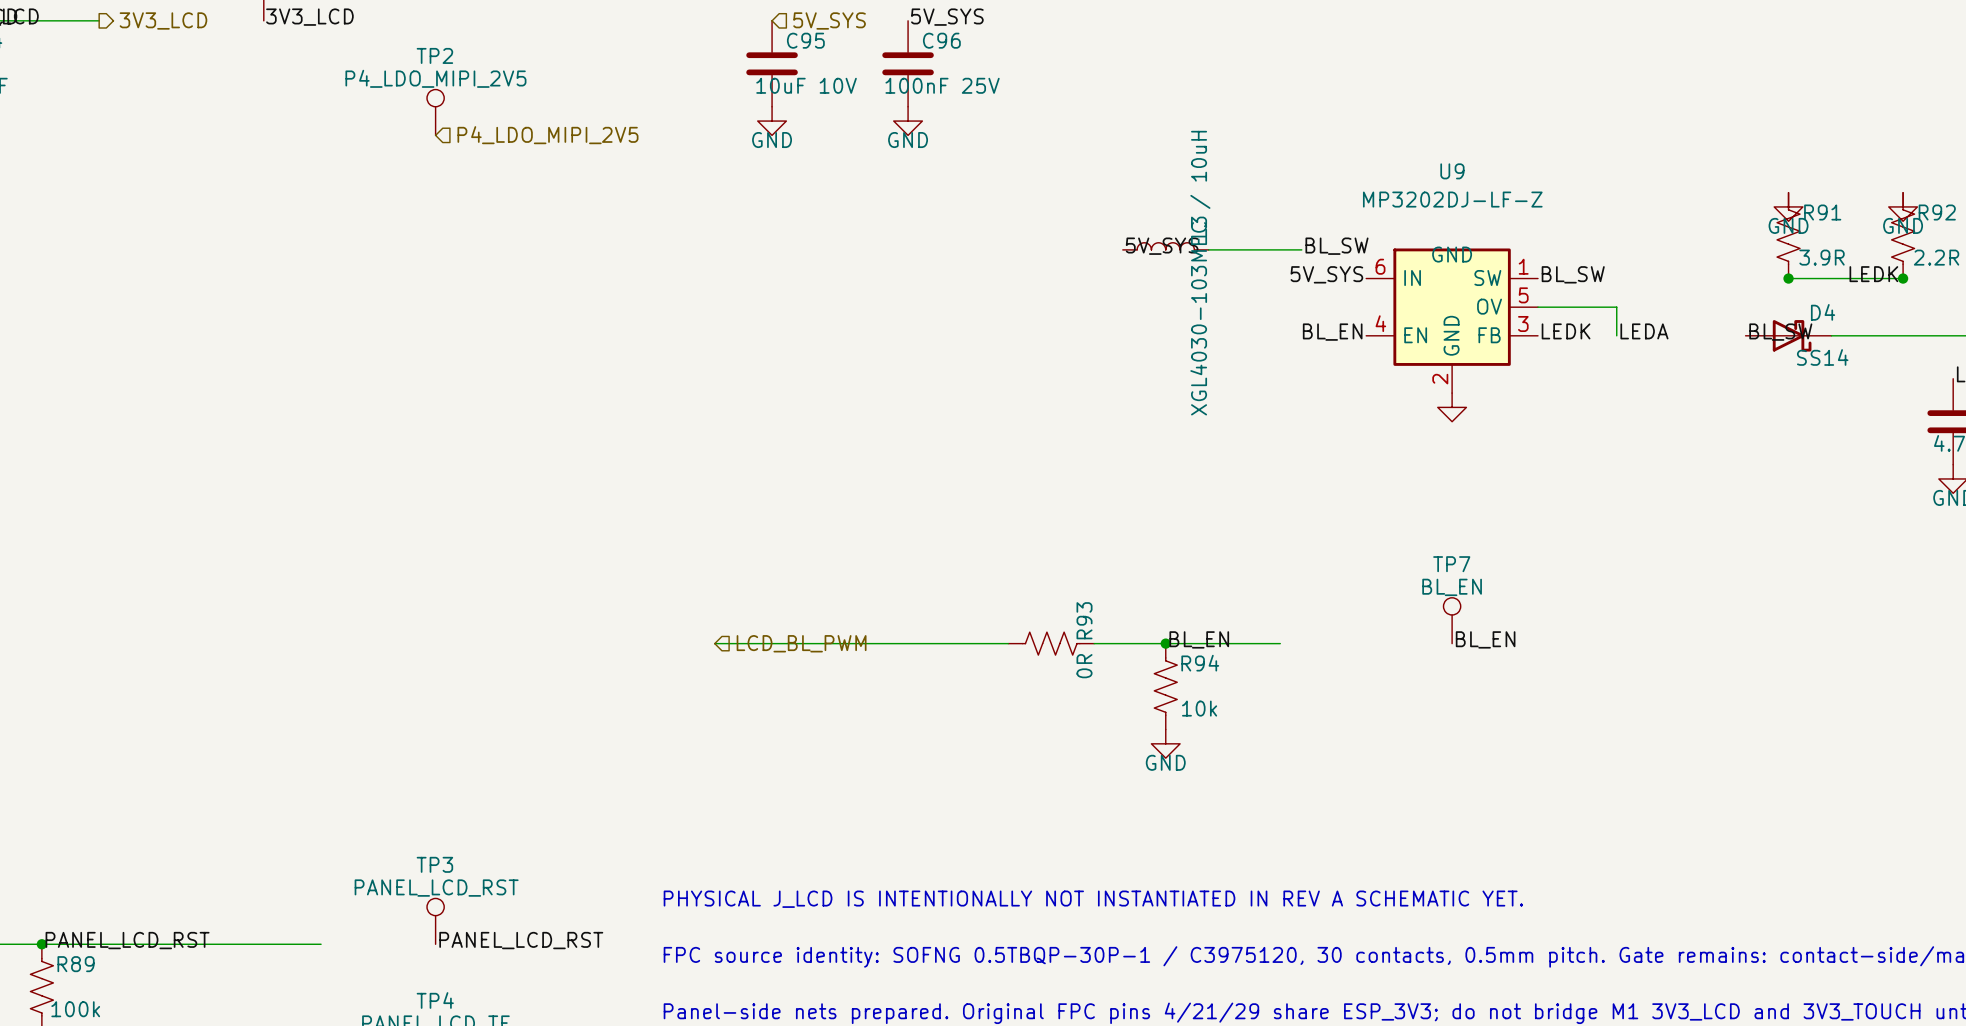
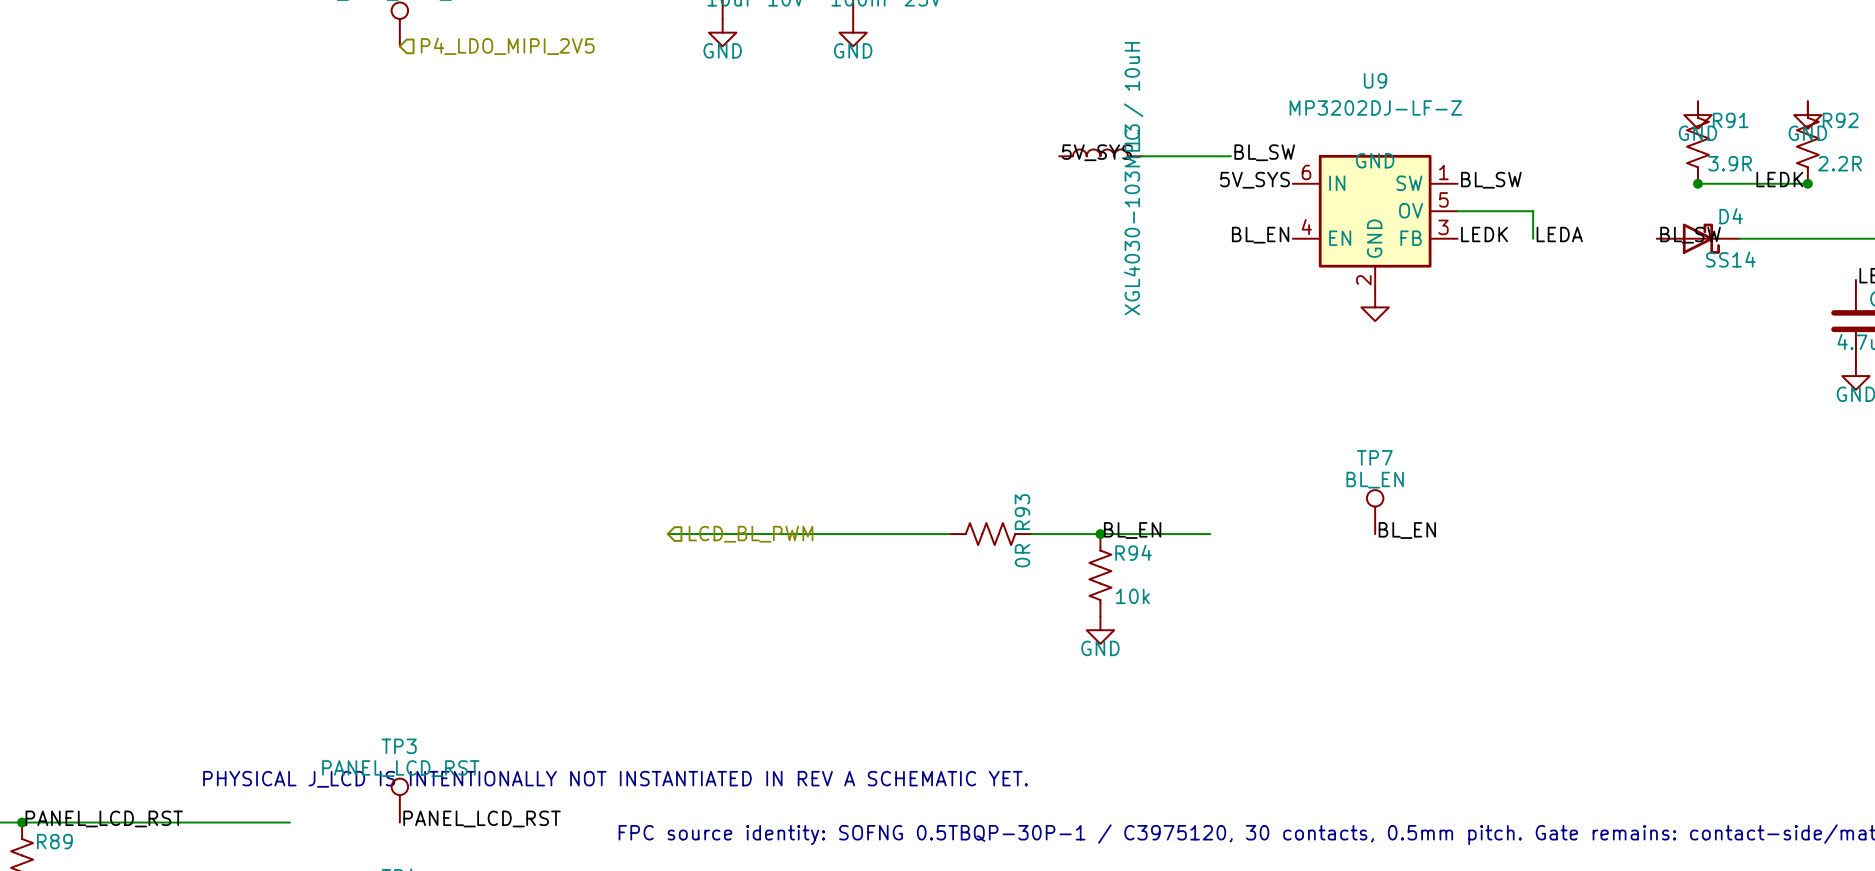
text position: PHYSICAL J_LCD IS INTENTIONALLY NOT INSTANTIATED IN REV A SCHEMATIC YET. (1093, 899) -> PHYSICAL J_LCD IS INTENTIONALLY NOT INSTANTIATED IN REV A SCHEMATIC YET. (615, 779)

